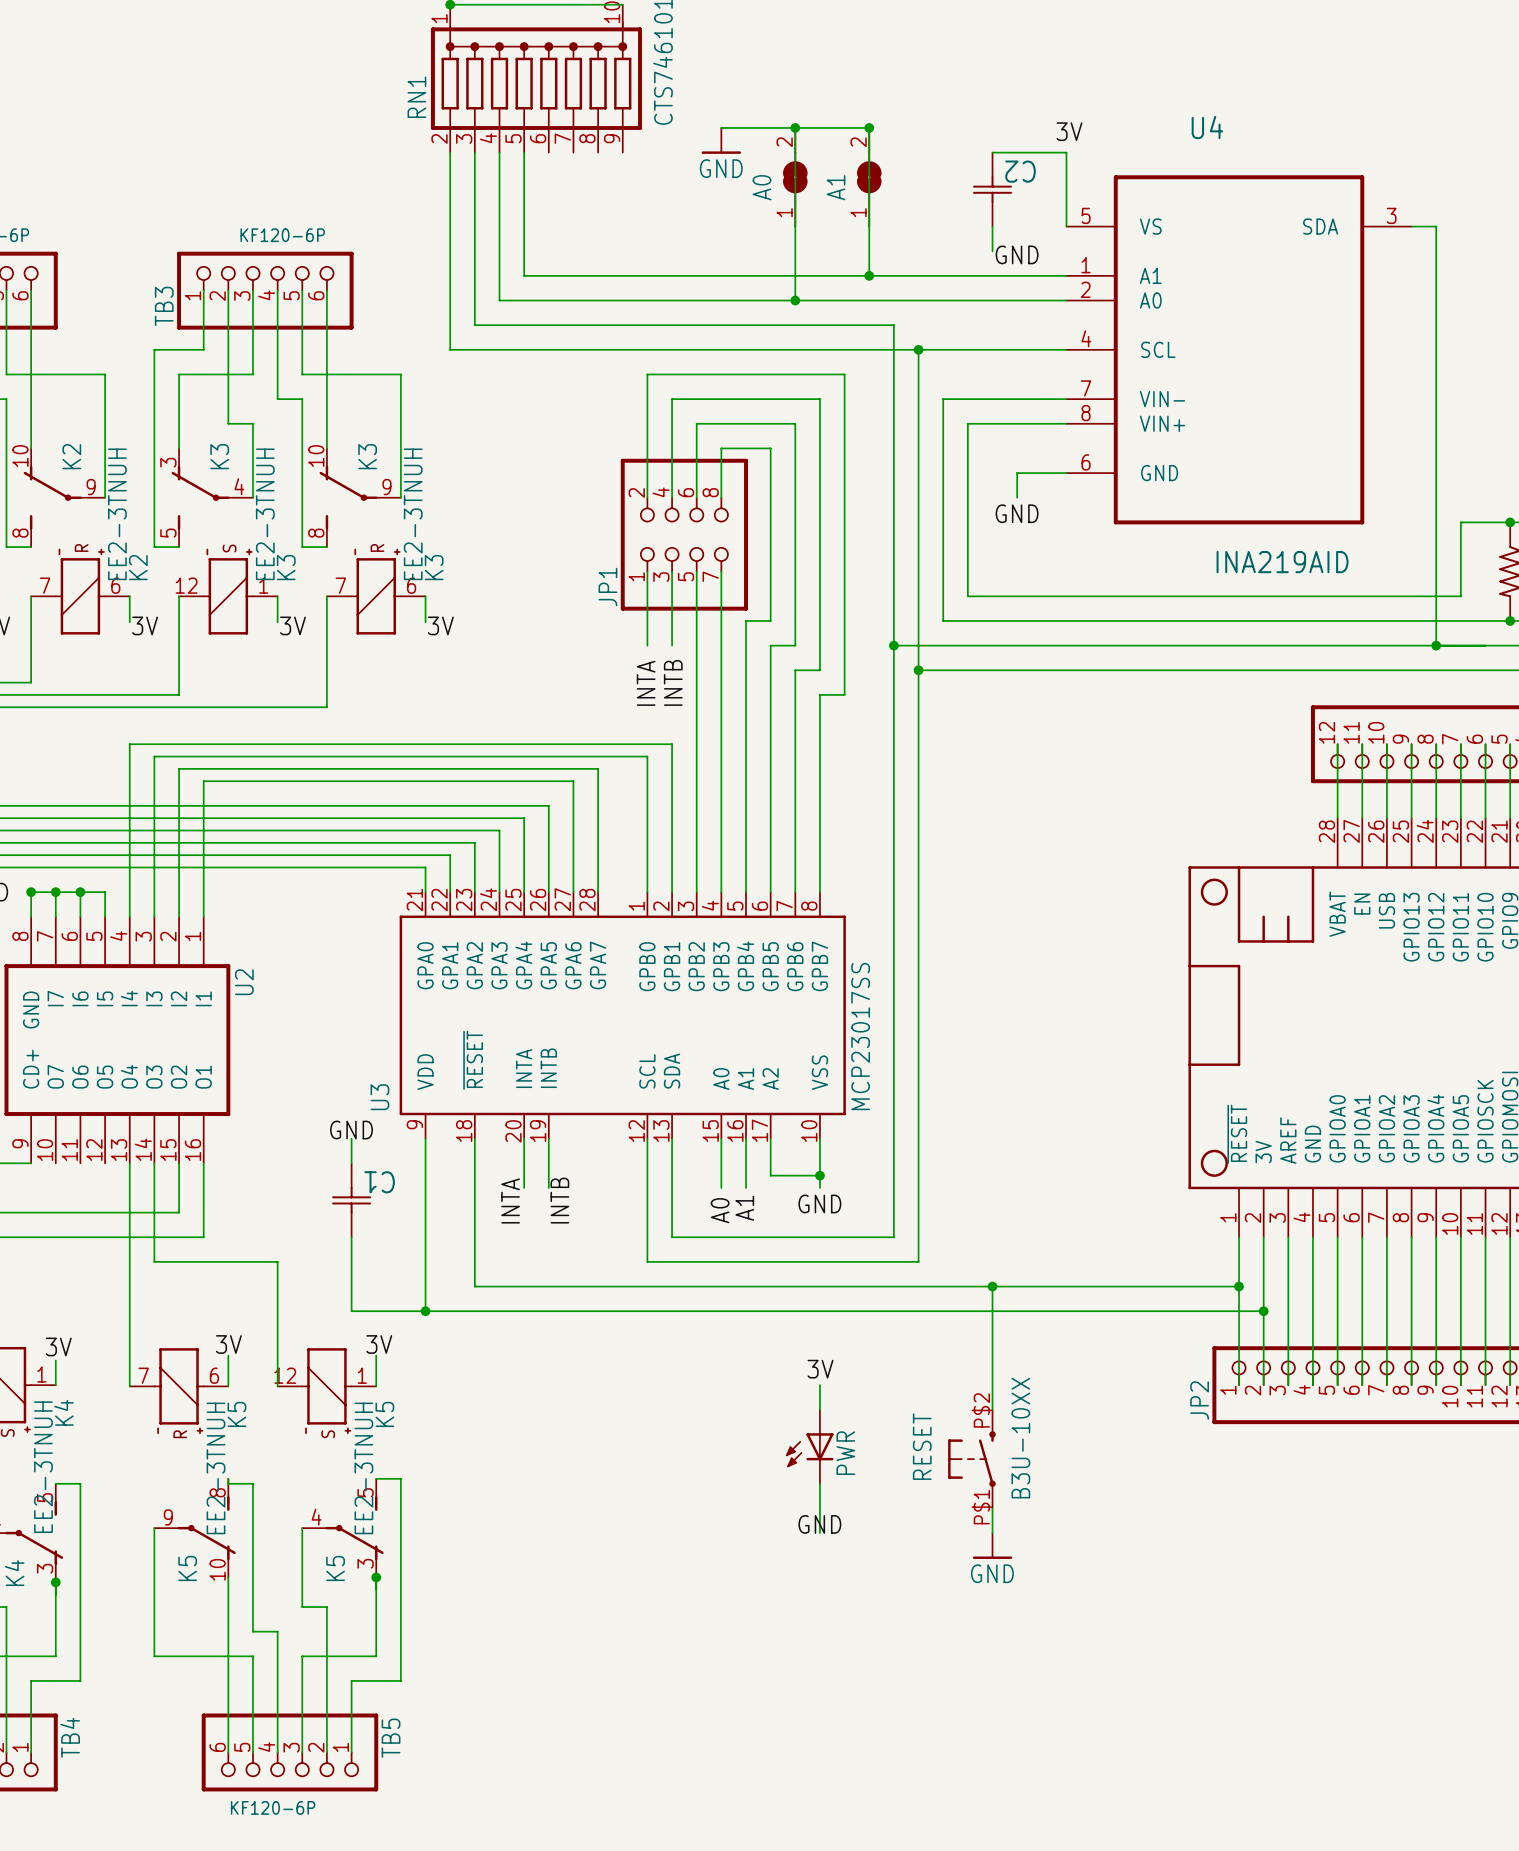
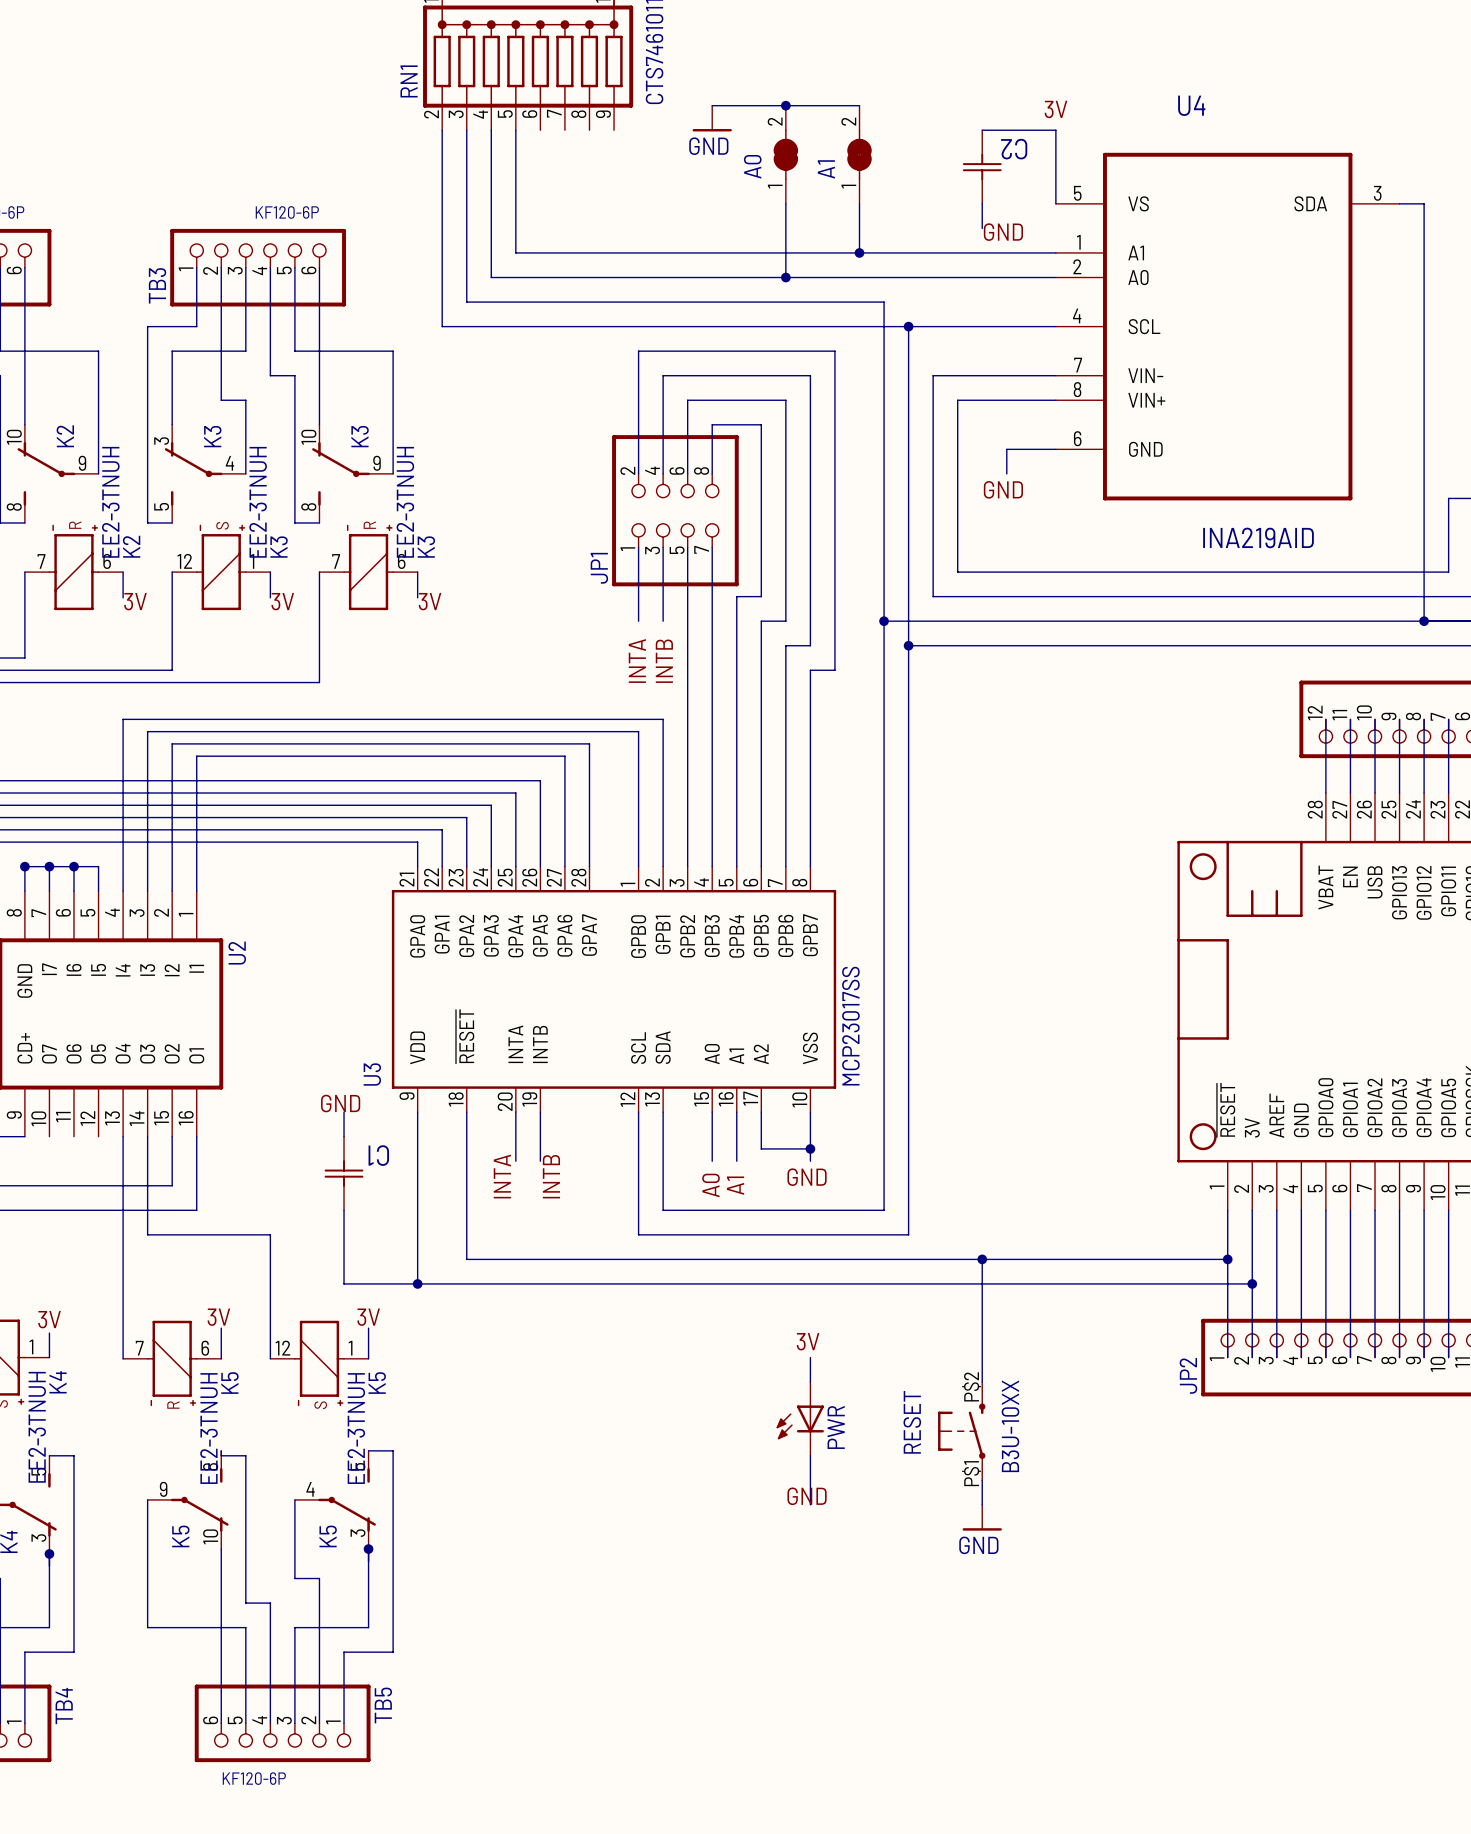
A0 symbol: [782, 127, 808, 227] -> [773, 105, 799, 204]
A1 symbol: [856, 127, 882, 227] -> [847, 105, 872, 204]
junction: (869, 127) -> none

